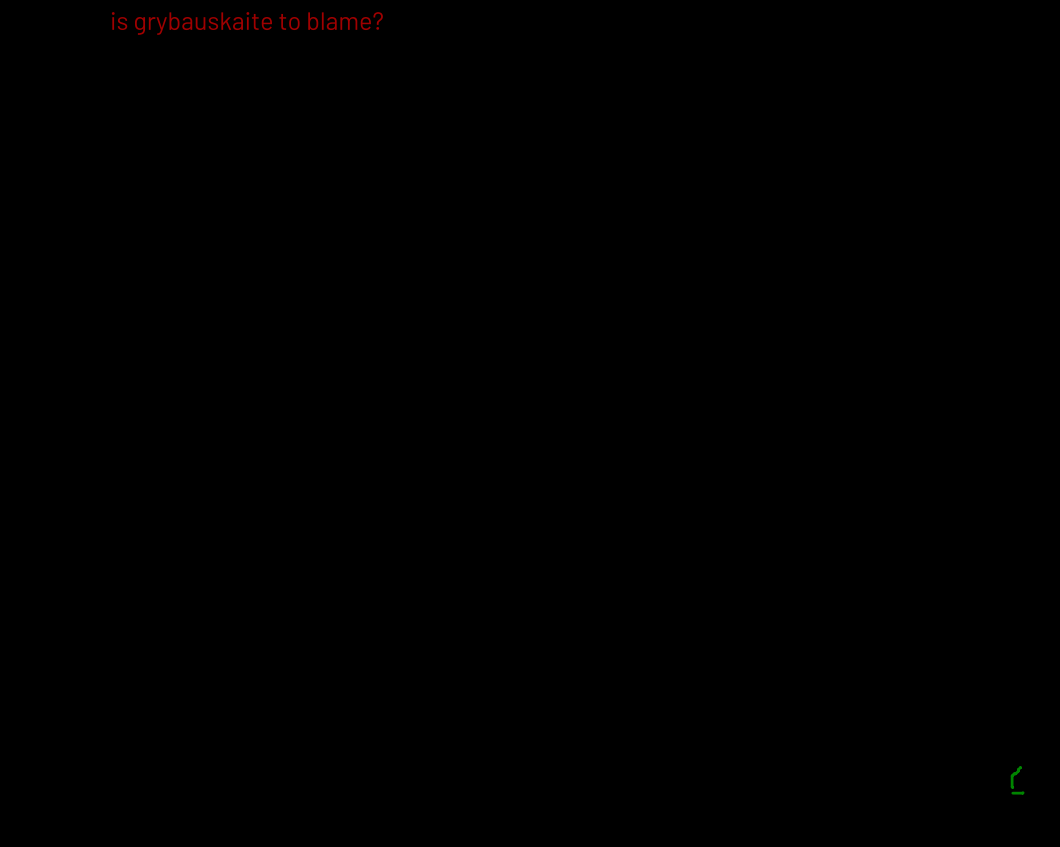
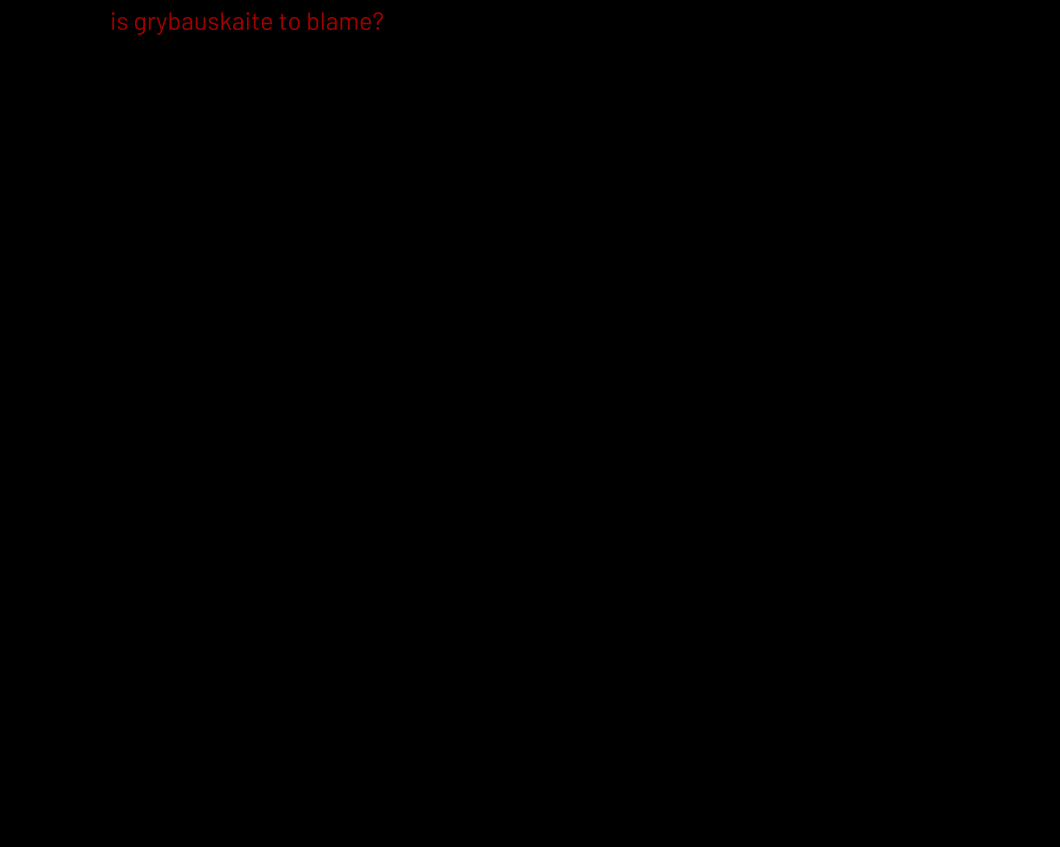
bottom track: (1020, 767) (1012, 775) (1012, 787) -> none
bottom track: (1023, 792) (1012, 793) -> none

